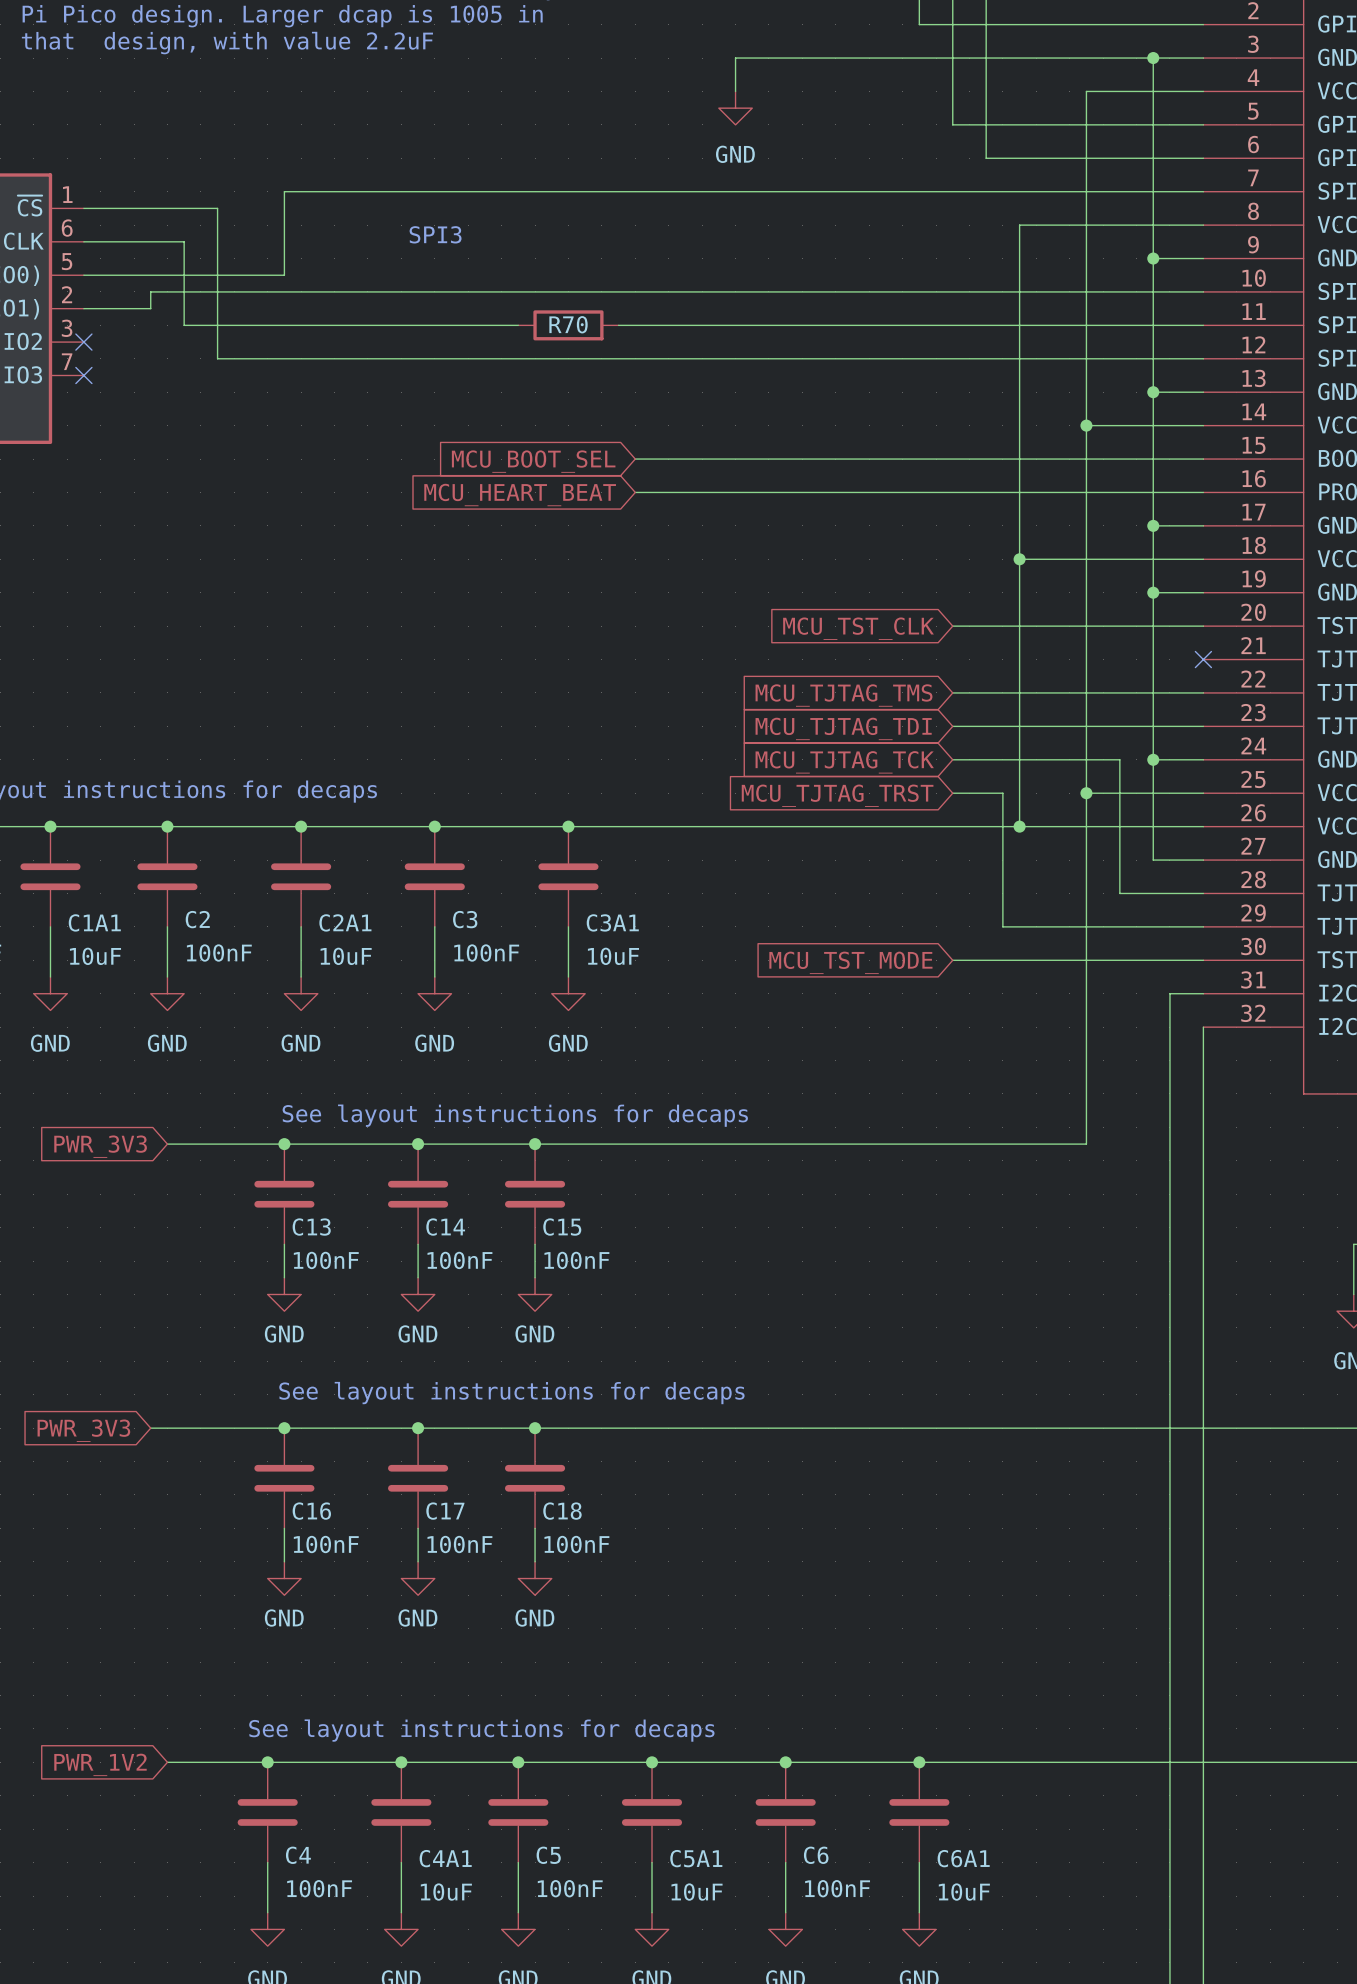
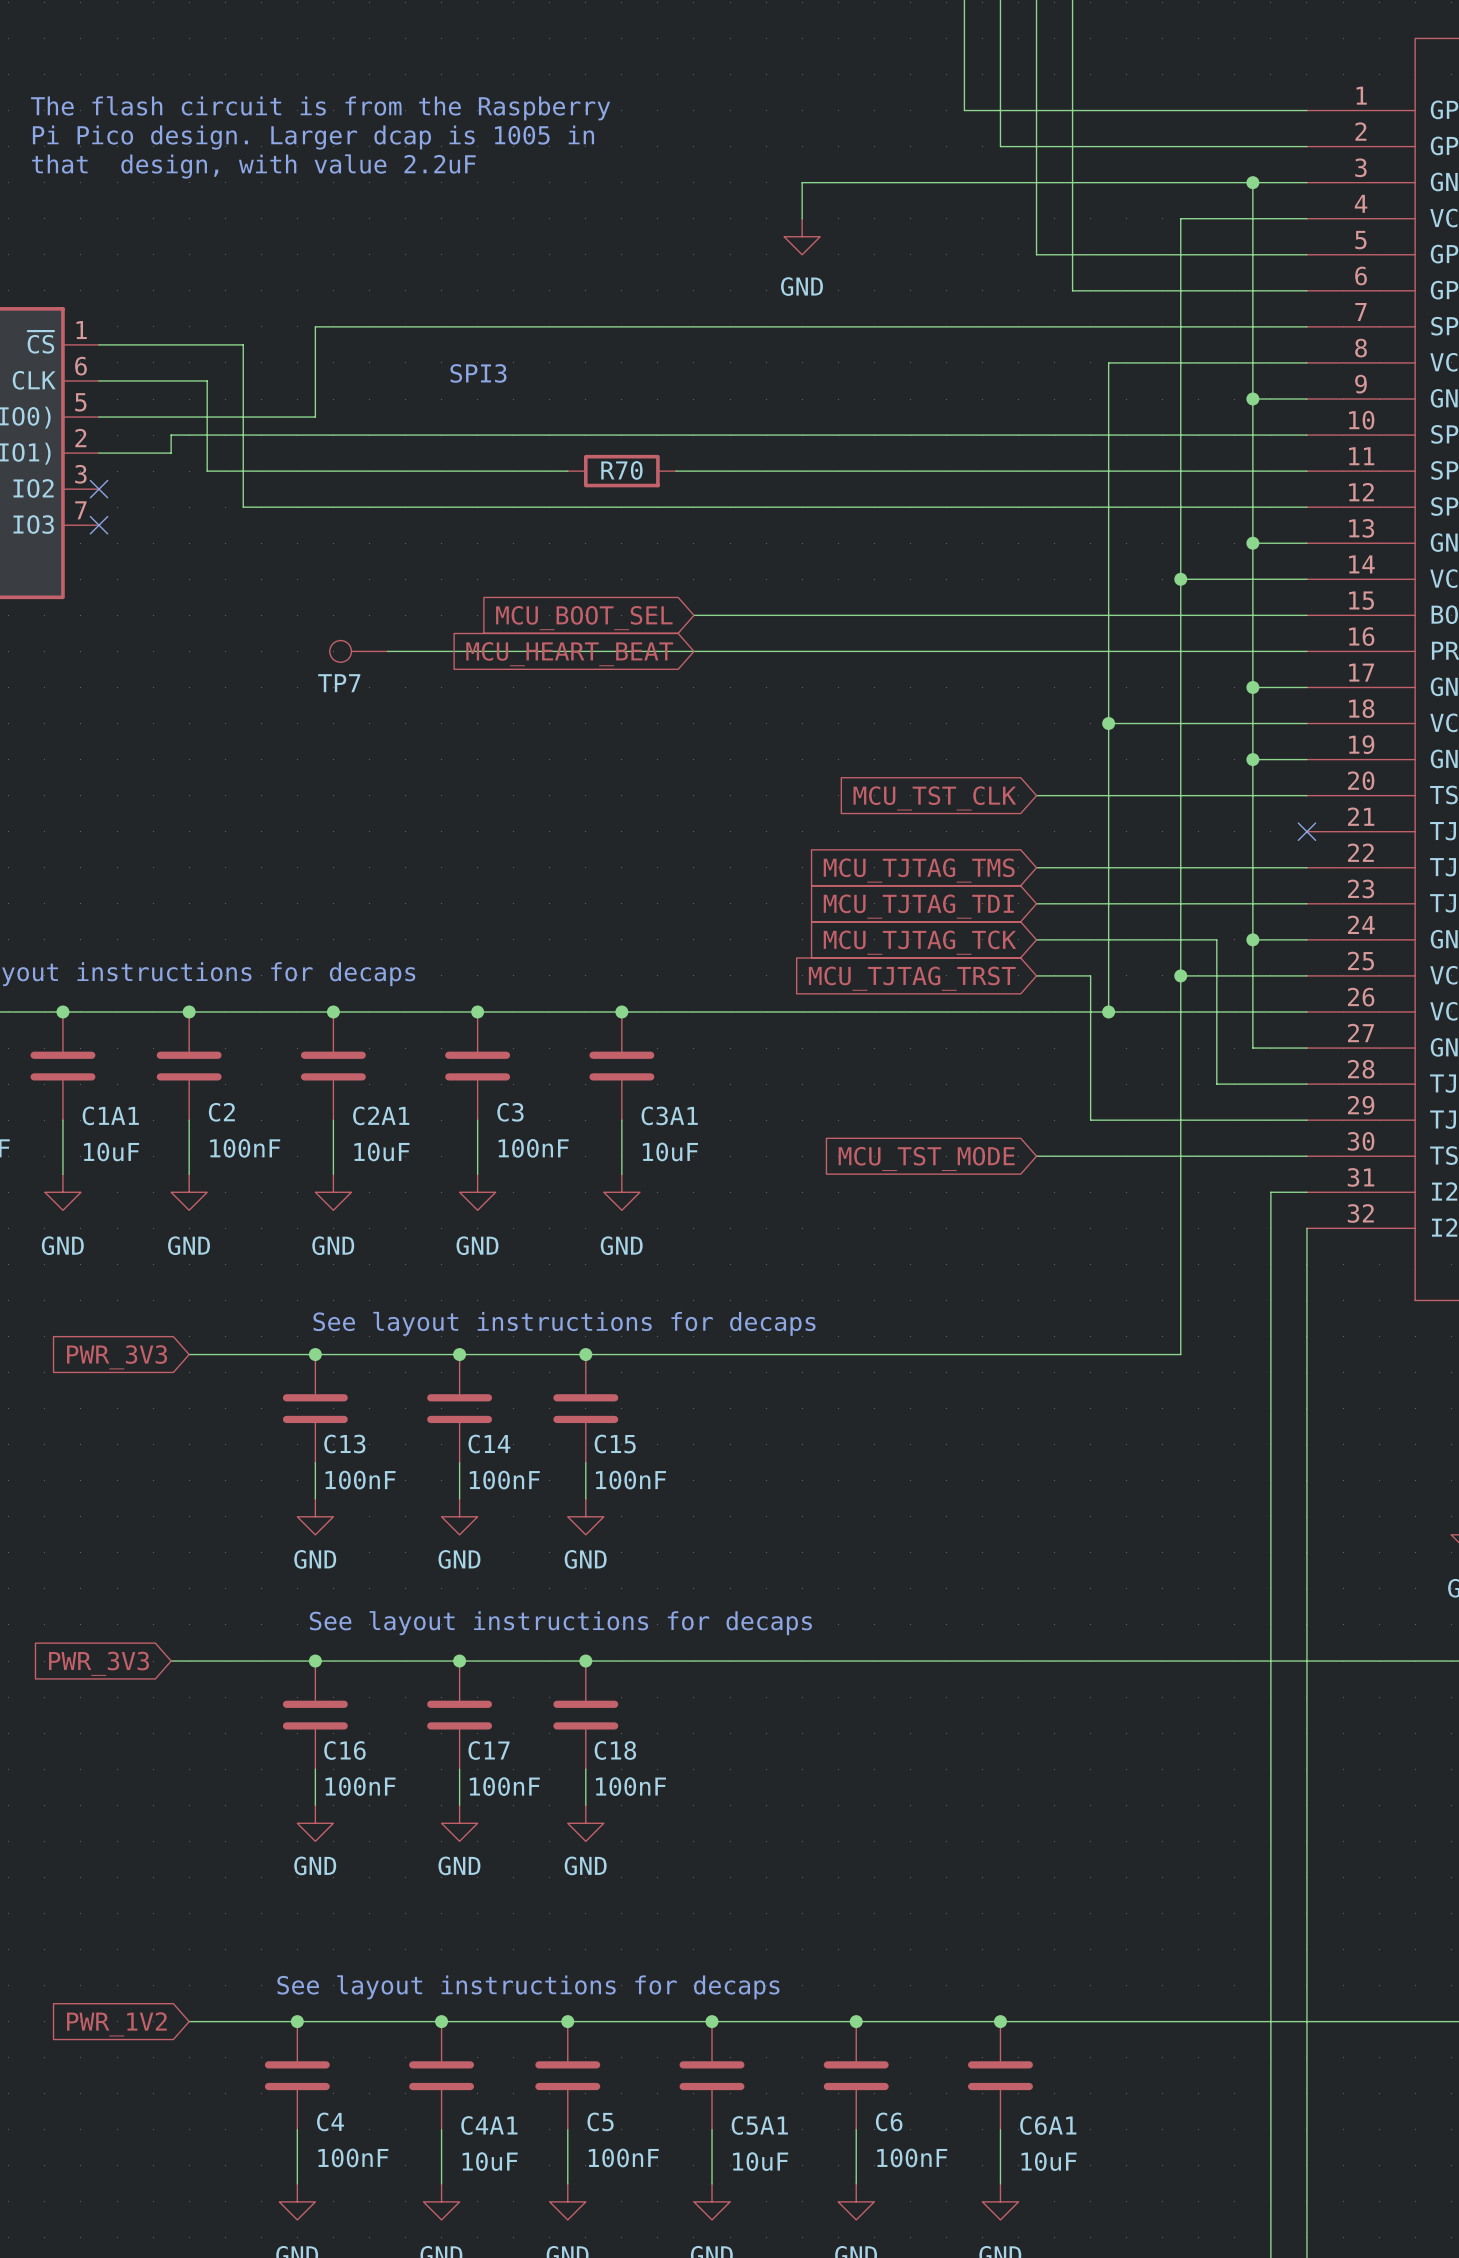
TP7: none -> (358, 651)
wire: none -> (387, 651) (693, 651)

